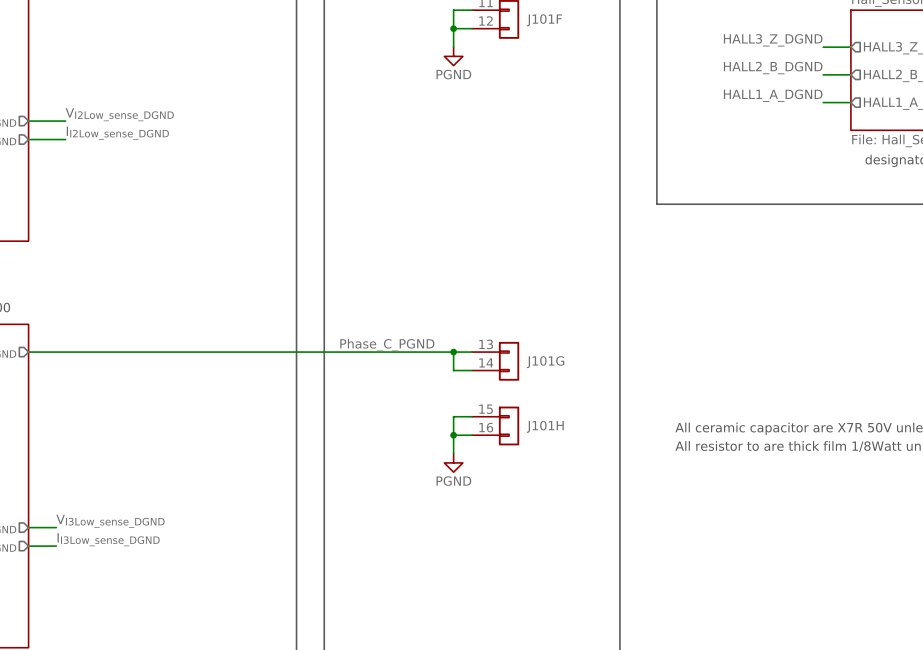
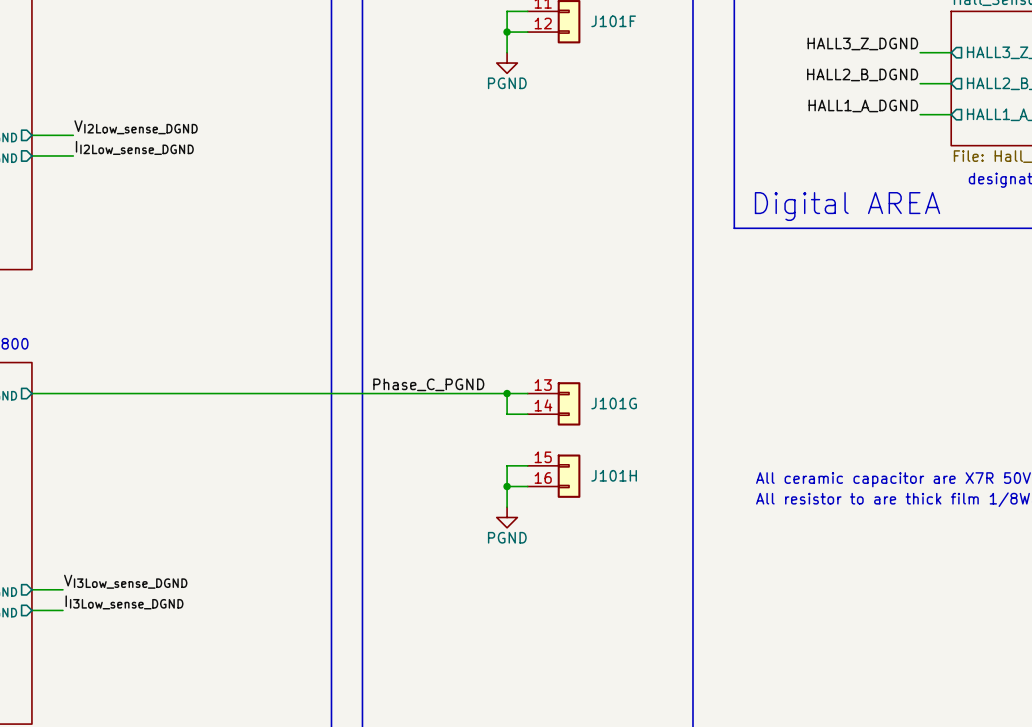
text: none -> Digital AREA (847, 206)

